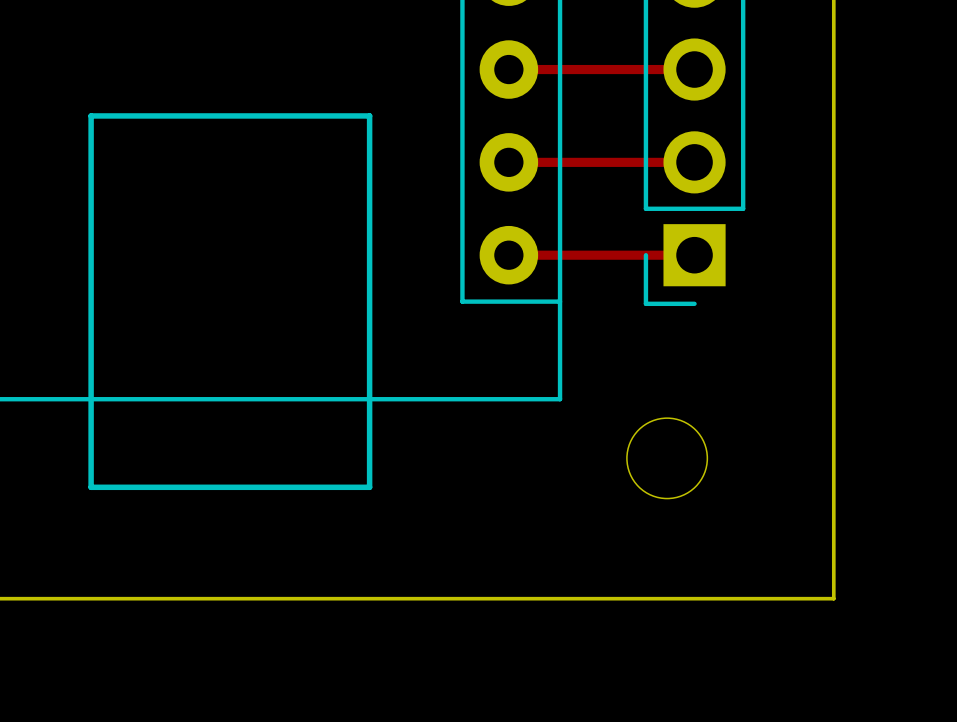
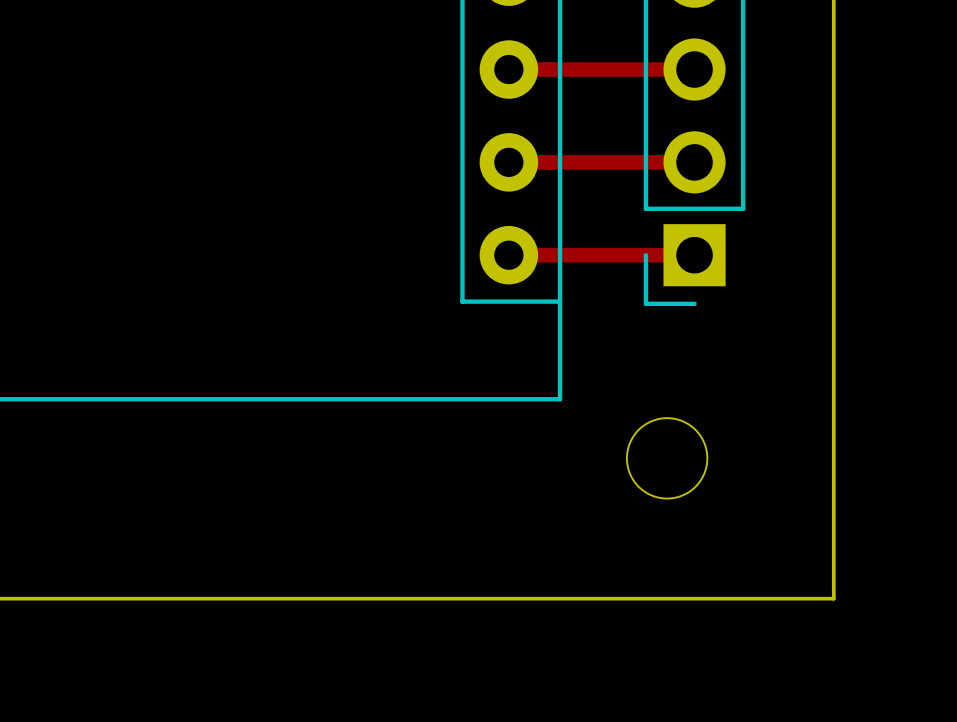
top track width: thin (508, 69) (694, 69) -> thick (508, 69) (694, 69)
line: (91, 115) (369, 115) (369, 487) (91, 487) (91, 115) -> none
top track width: thin (508, 162) (694, 162) -> thick (508, 162) (694, 162)
top track width: thin (508, 255) (694, 255) -> thick (508, 255) (694, 255)

